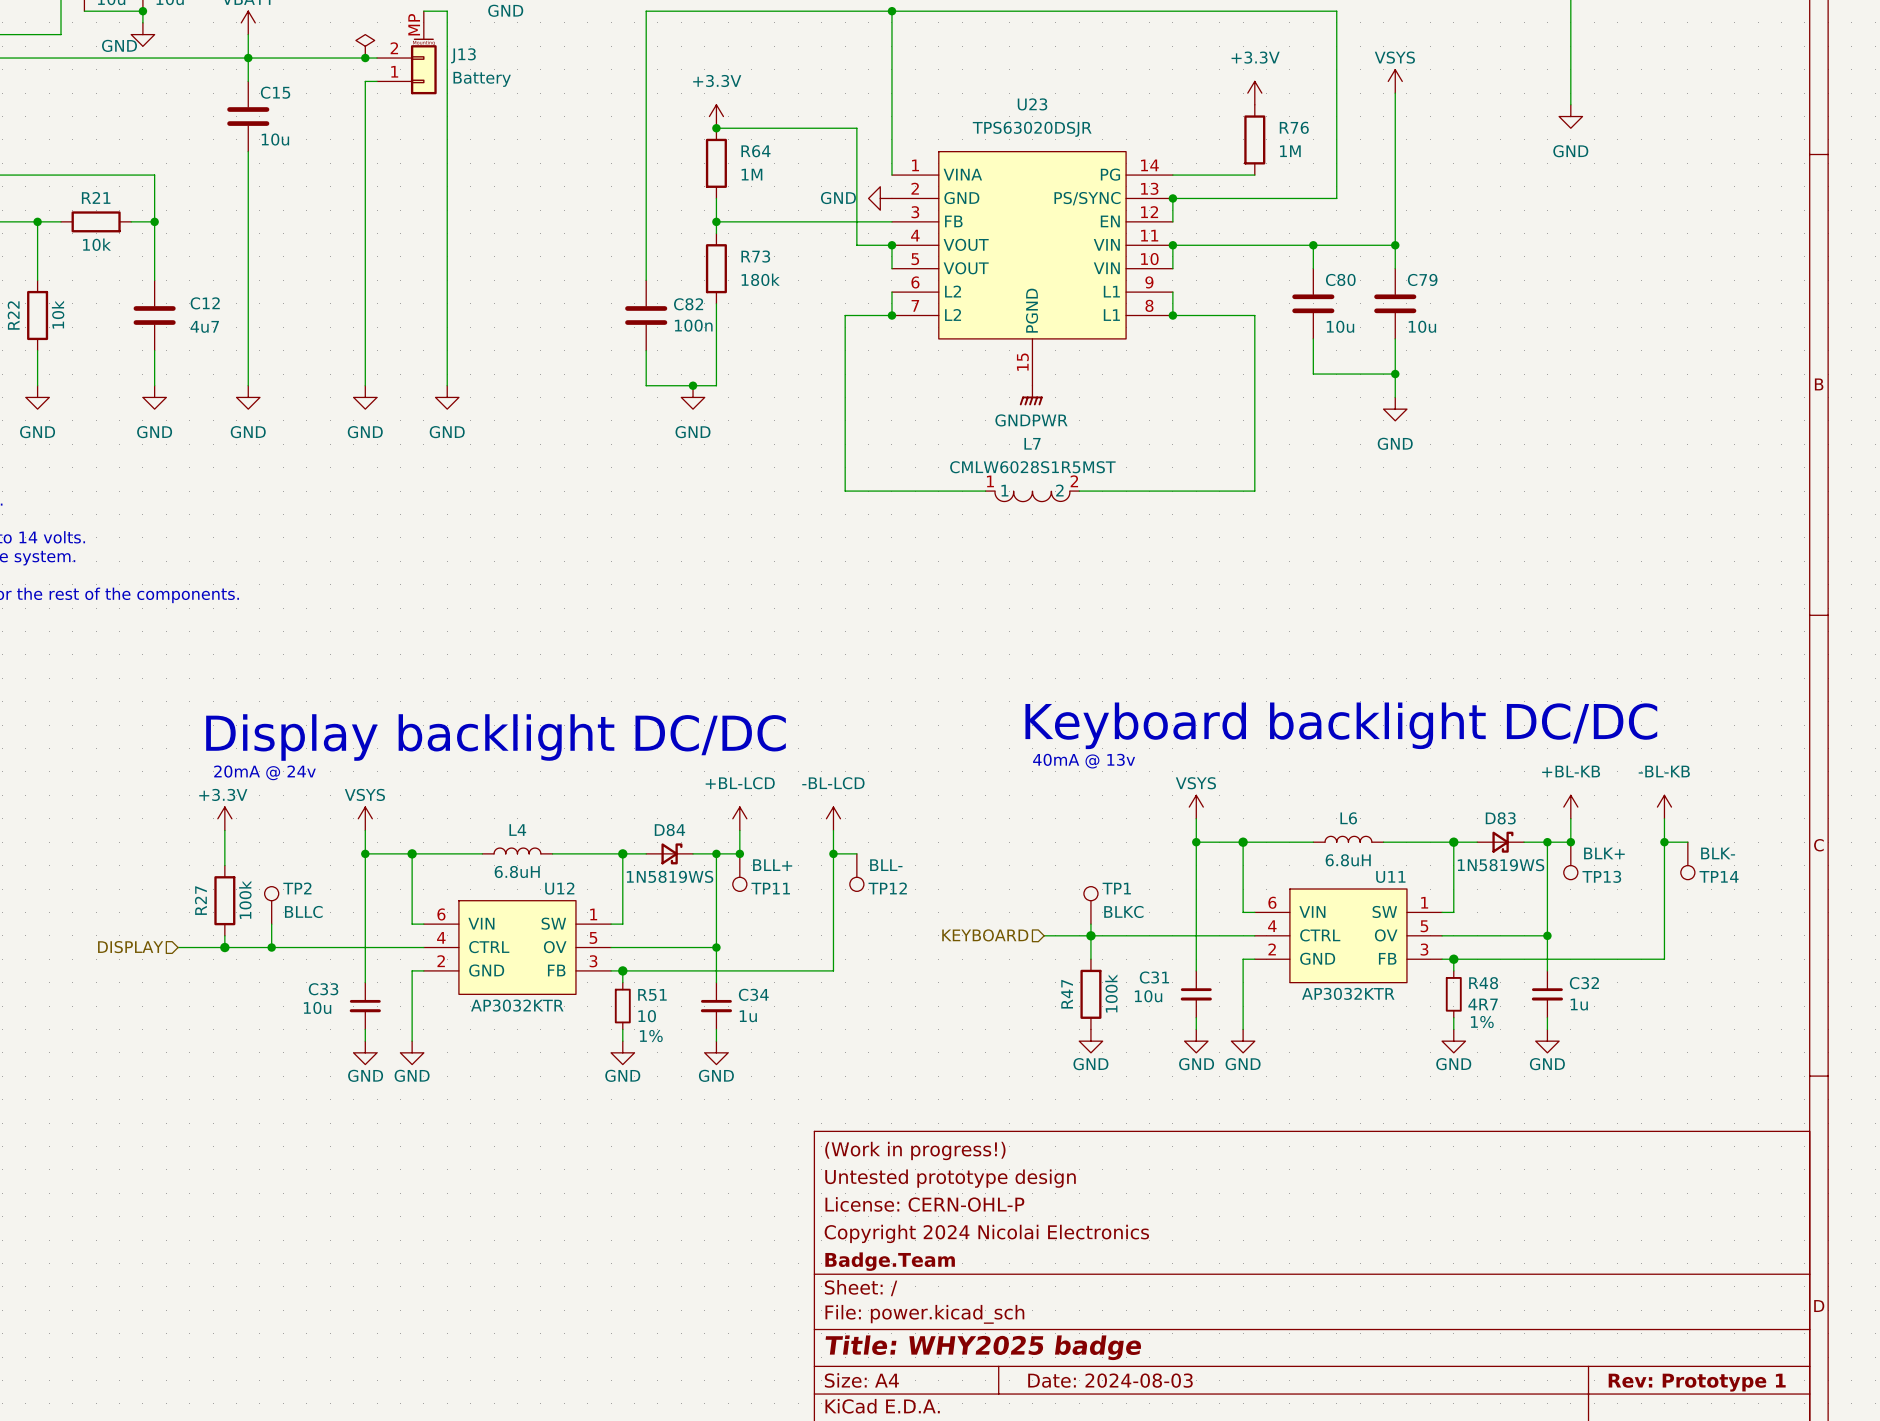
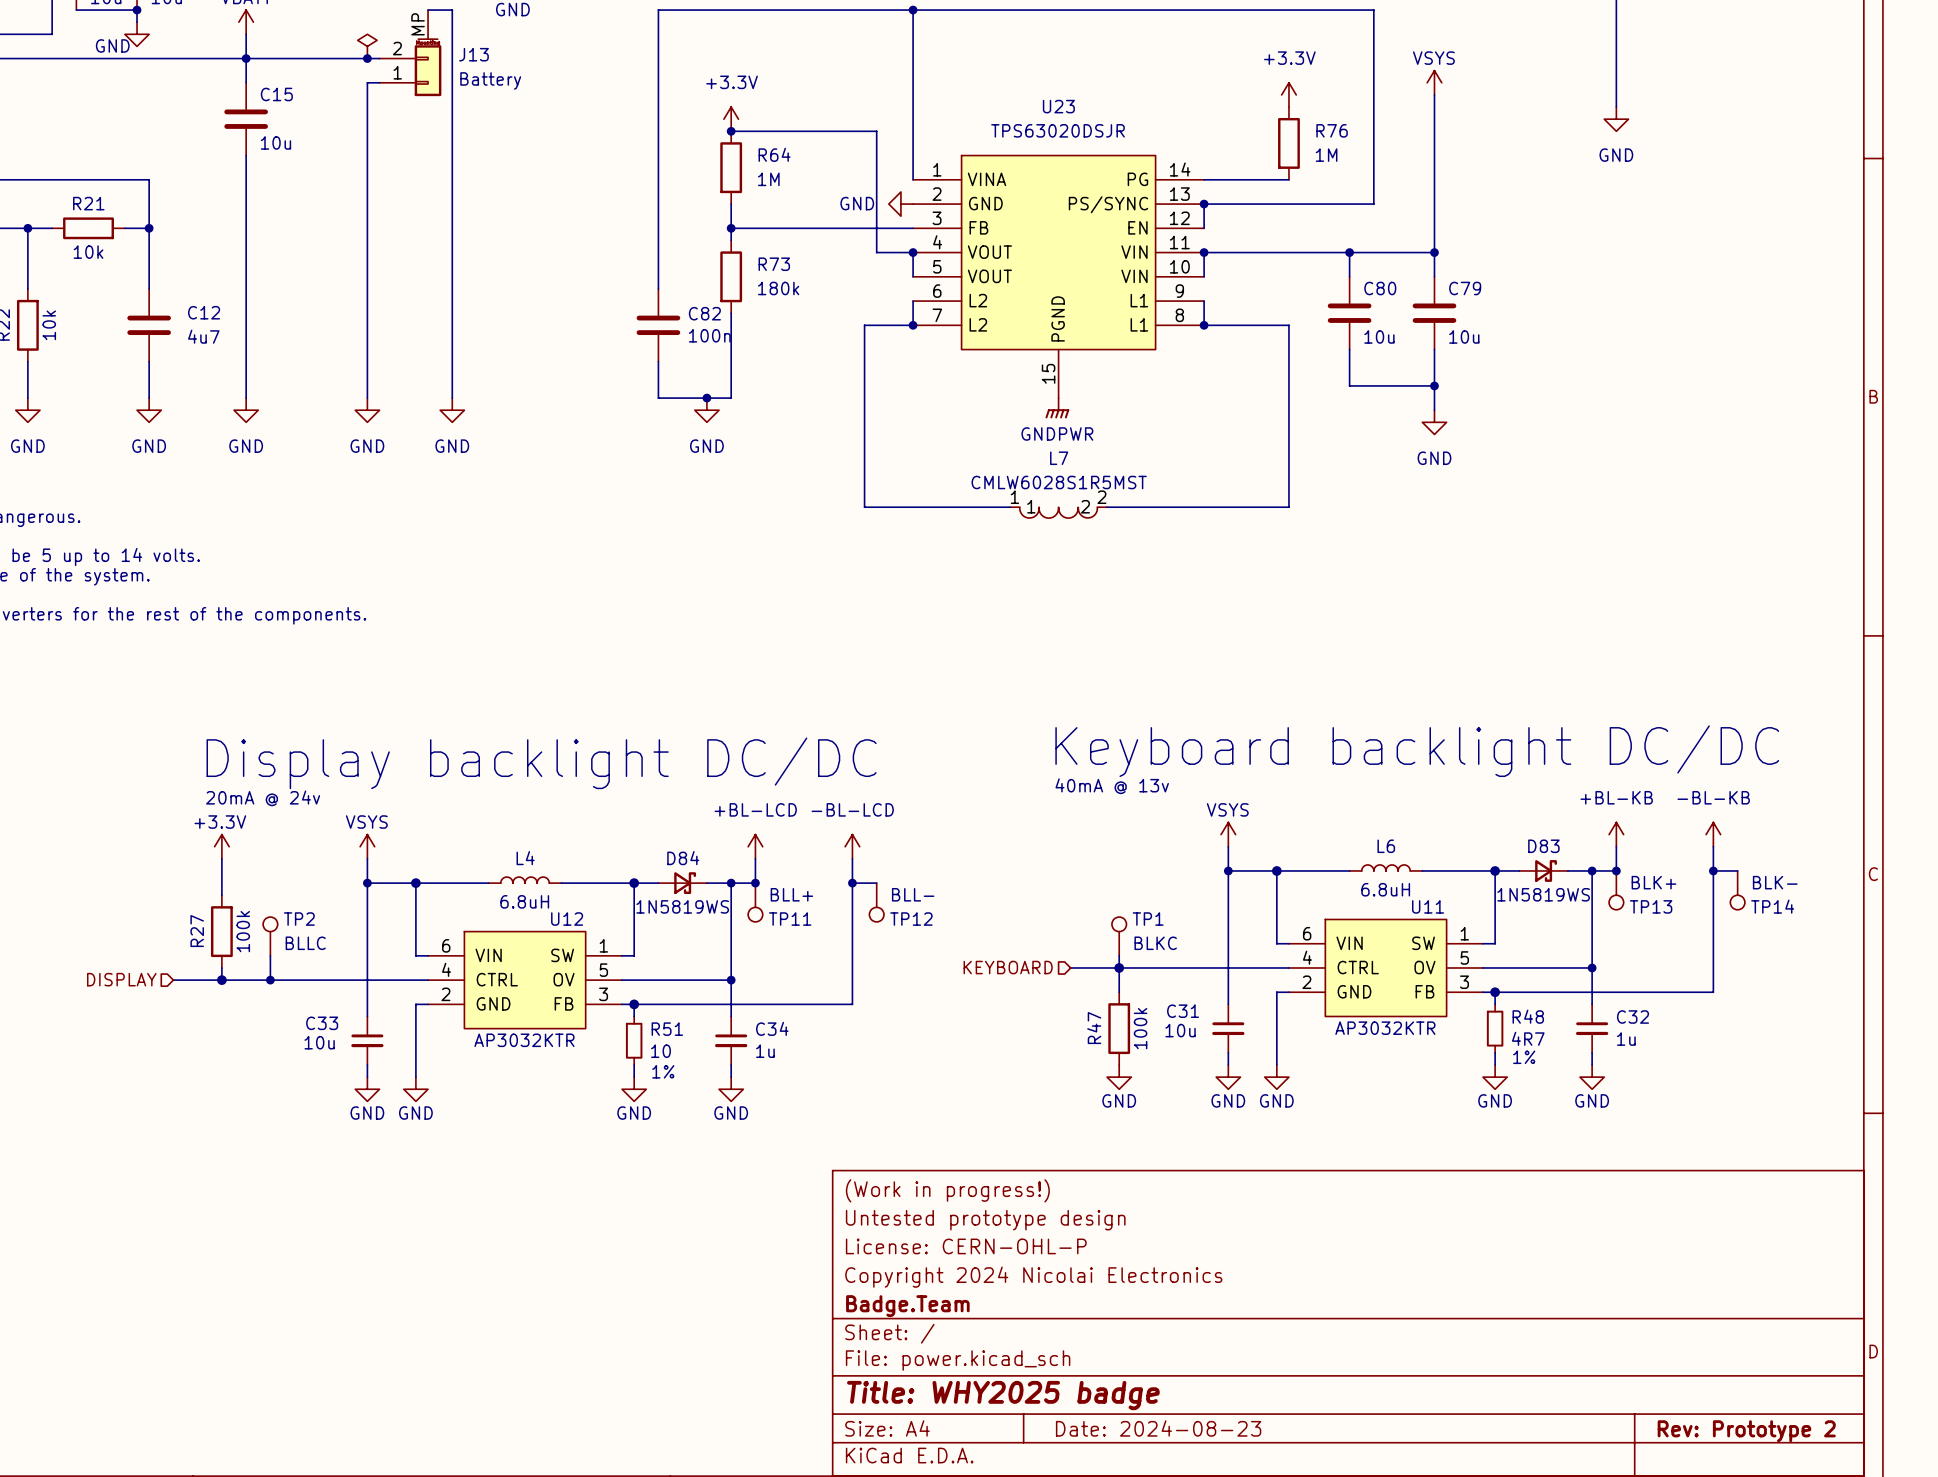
title block: Date: 2024-08-03 (1110, 1380) -> Date: 2024-08-23 (1158, 1428)
title block: Rev: Prototype 1 (1697, 1382) -> Rev: Prototype 2 (1746, 1431)

